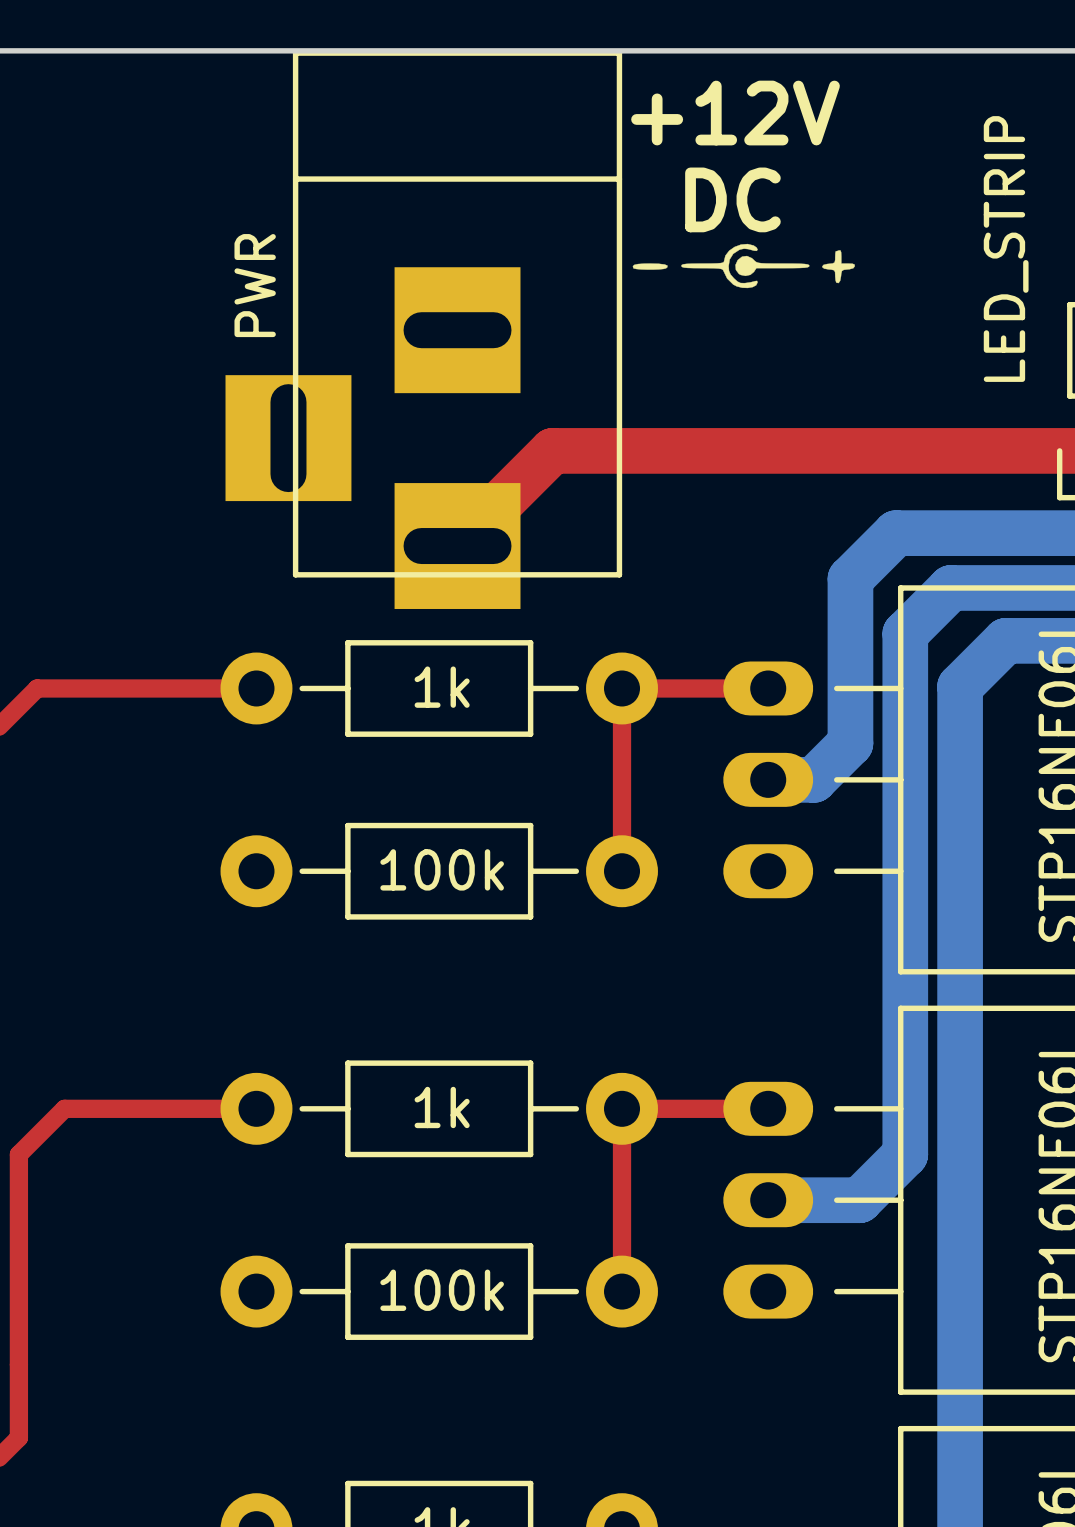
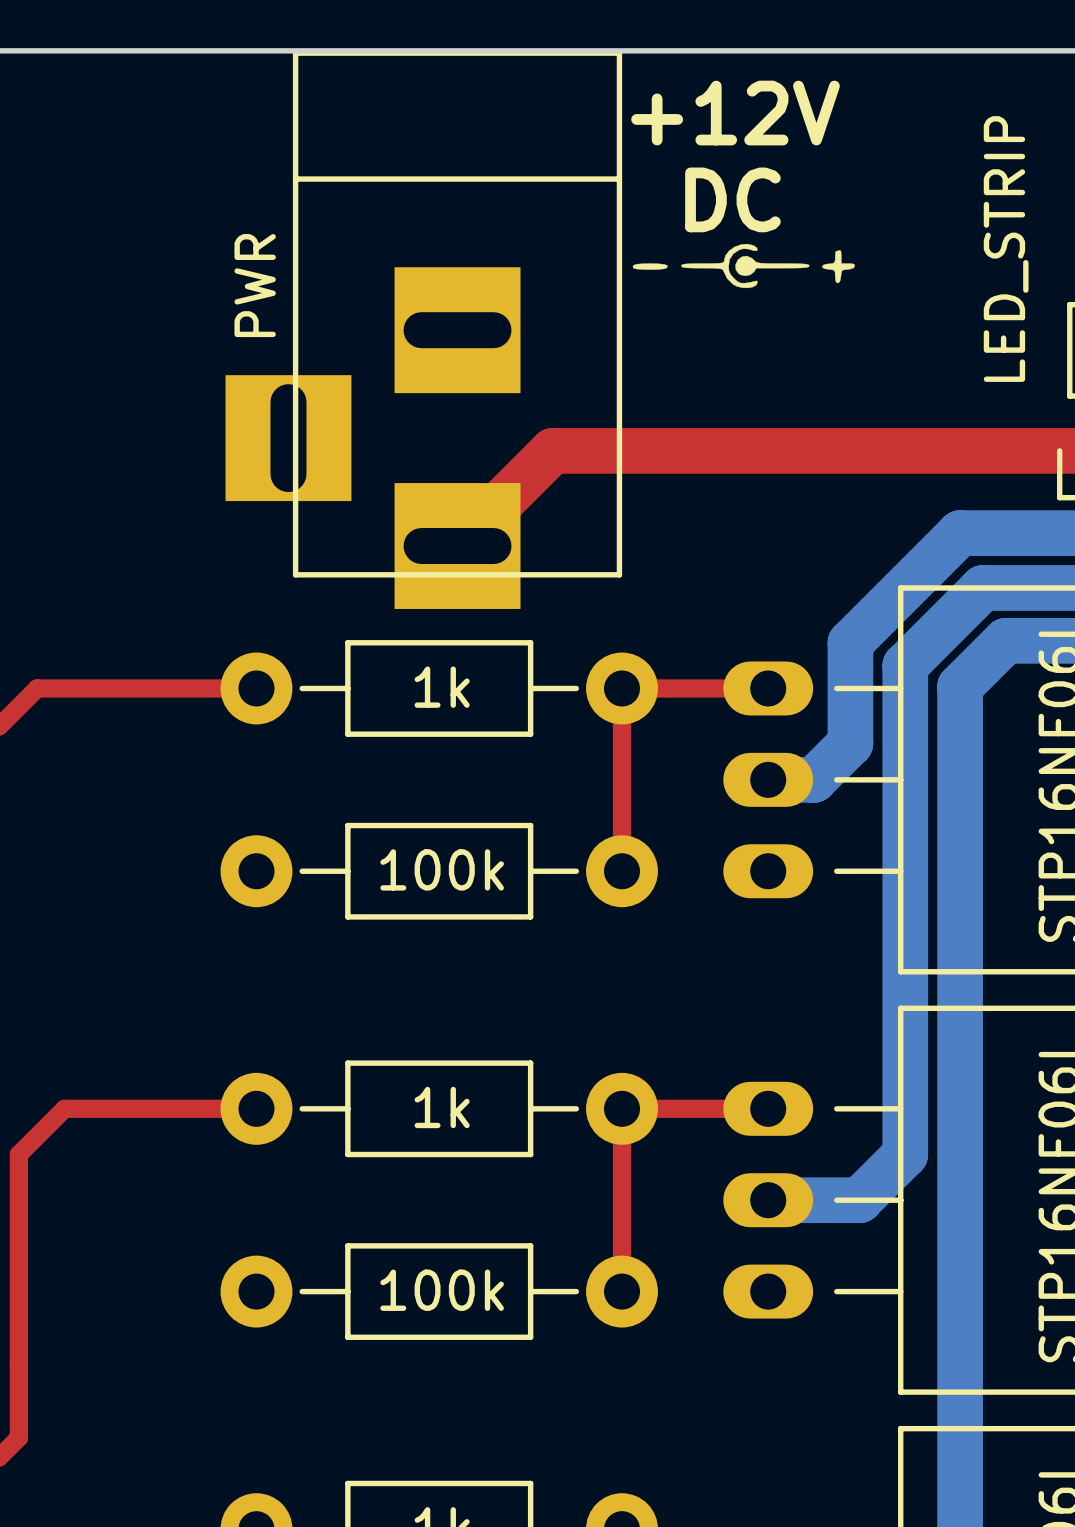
bottom track: (960, 533) (896, 533) (850, 578) (850, 642) -> (960, 533) (850, 642)
bottom track: (982, 587) (950, 587) (905, 633) (905, 665) -> (982, 587) (905, 665)

